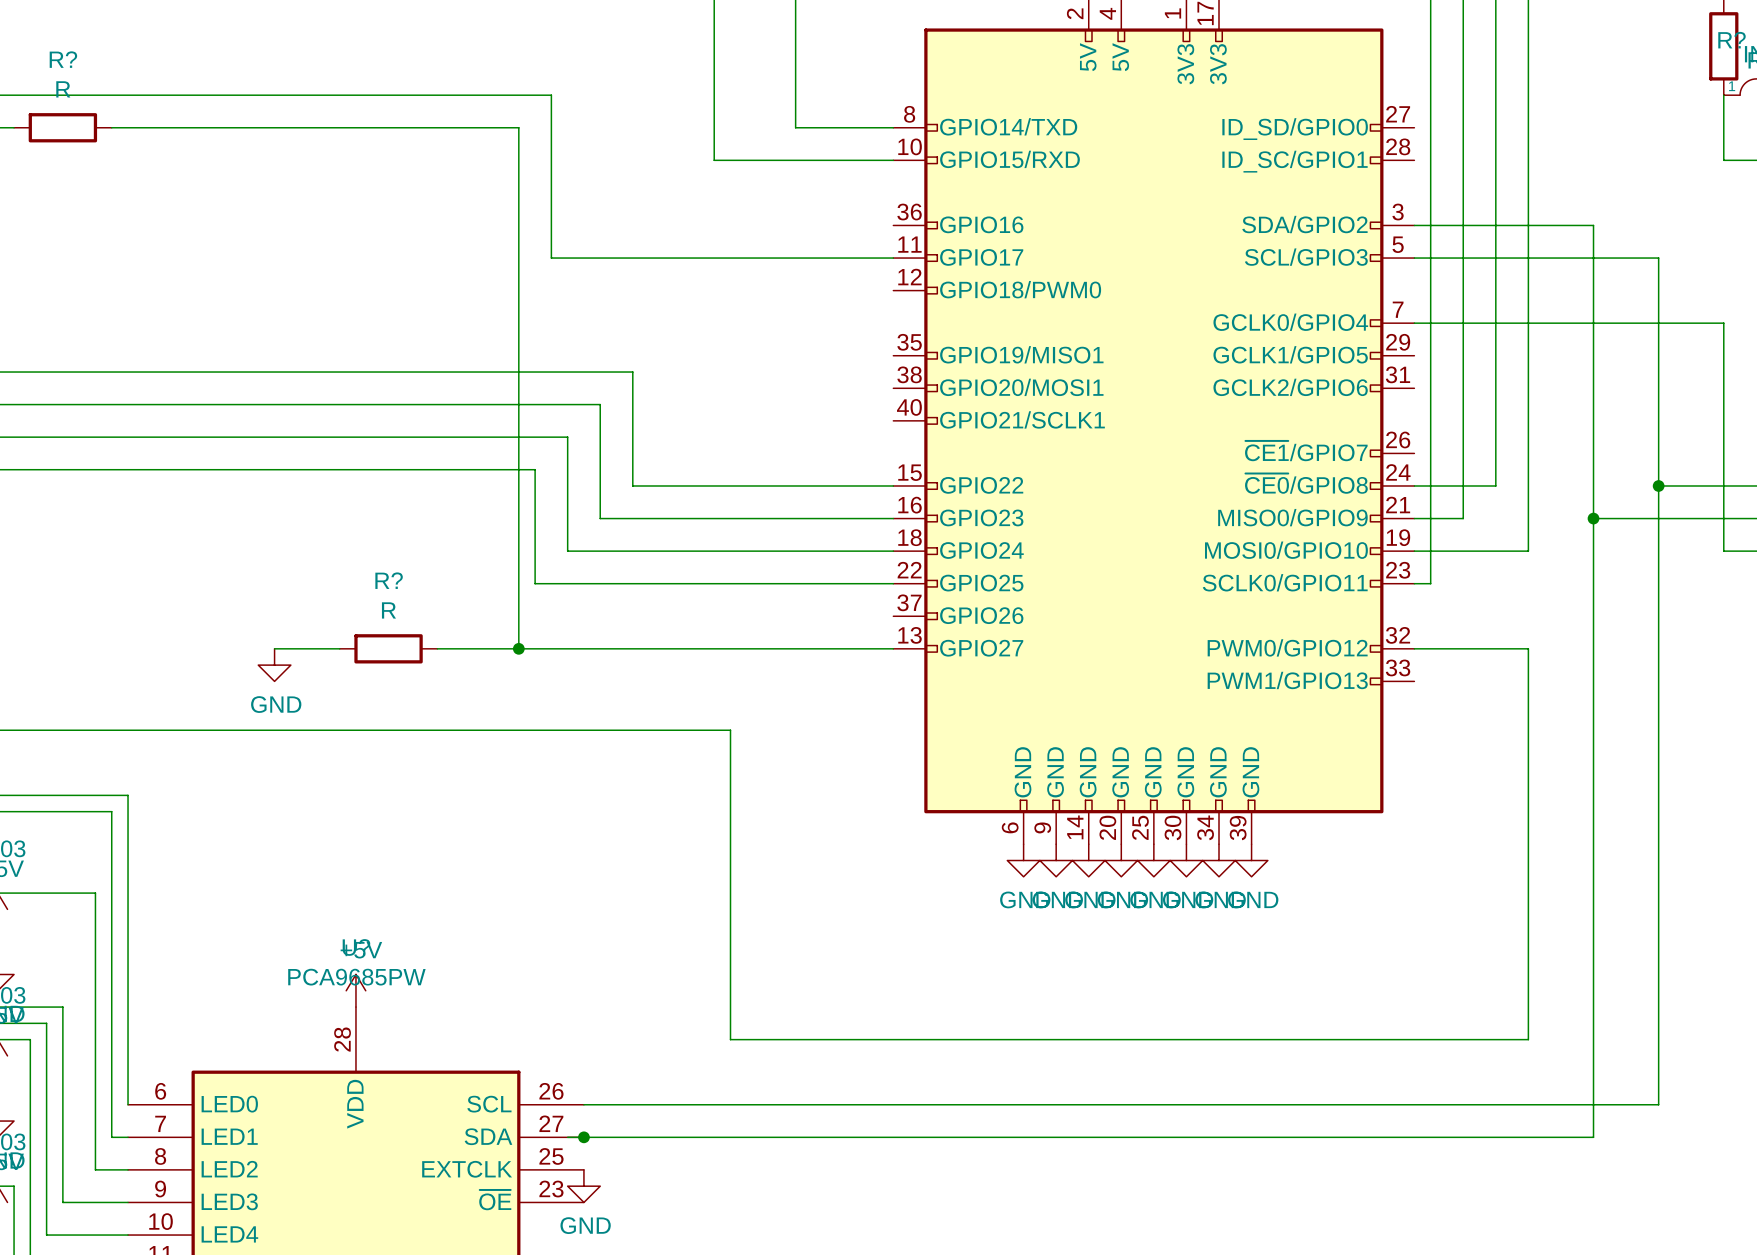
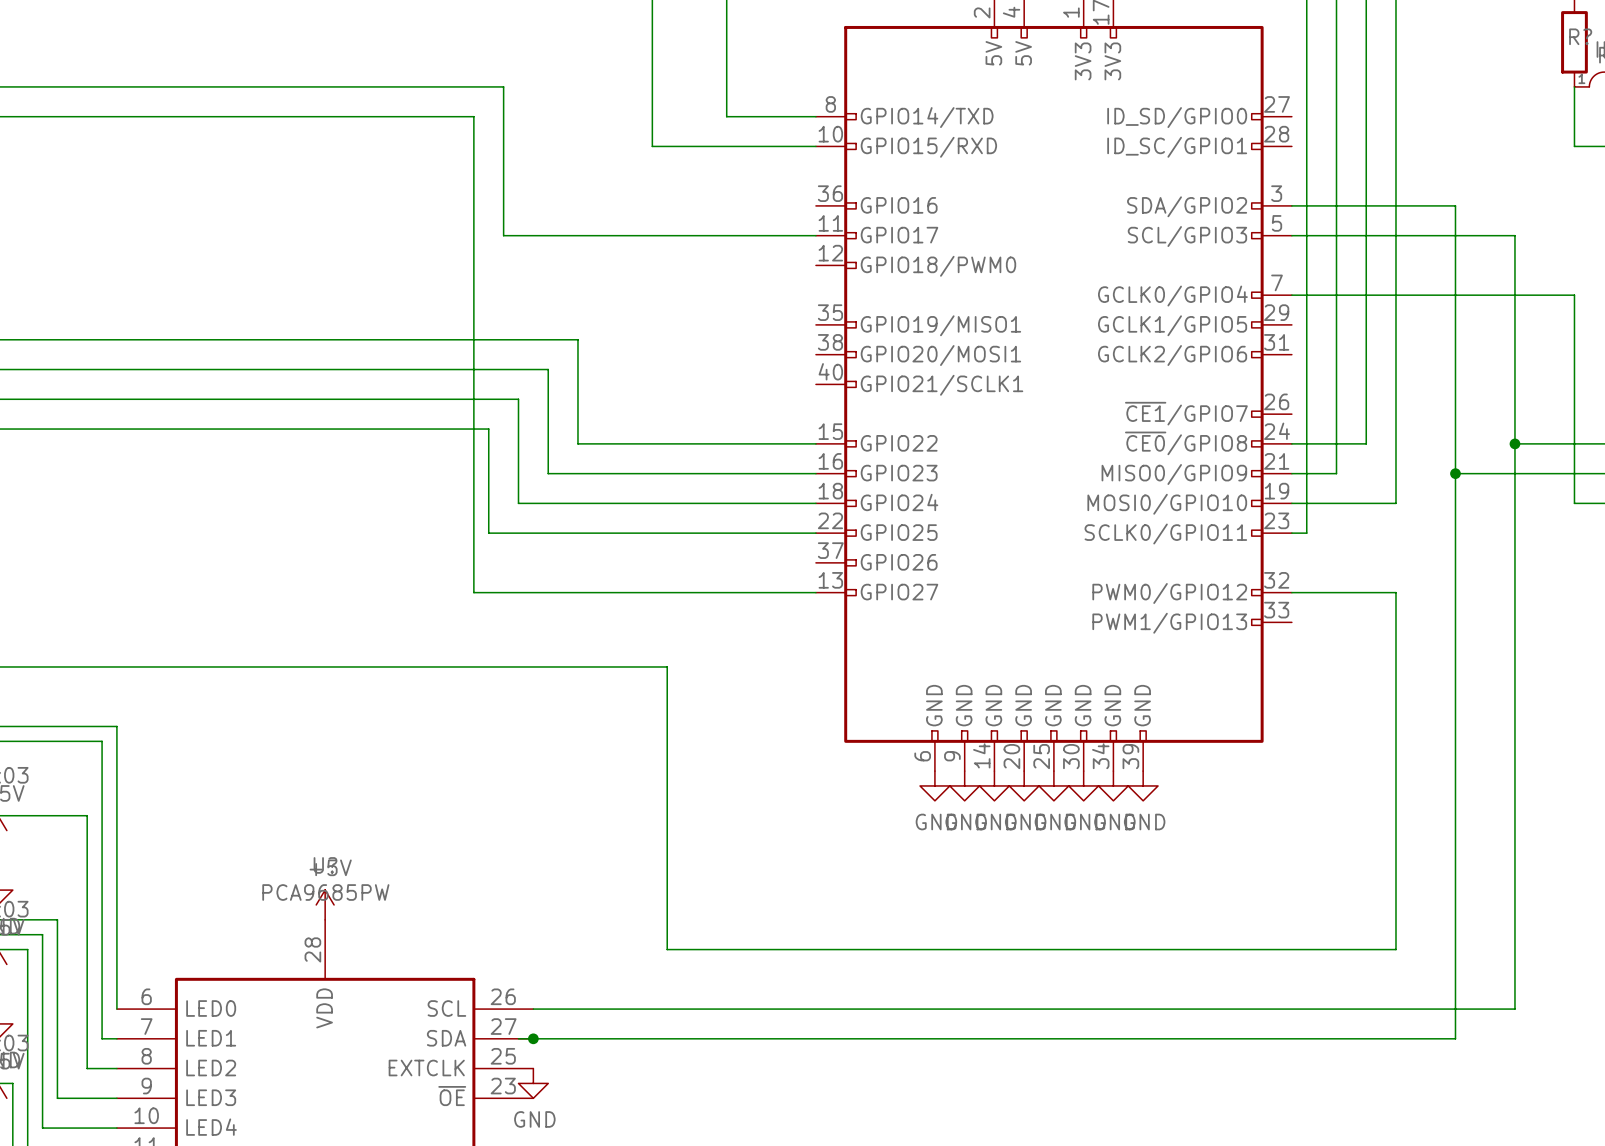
wire: none -> (12, 116) (102, 116)
R?: R (62, 127) -> none
wire: (274, 648) (339, 648) -> none
R?: R (388, 648) -> none
wire: (437, 648) (518, 648) -> none
junction: (518, 648) -> none
power symbol: GND (274, 665) -> none

